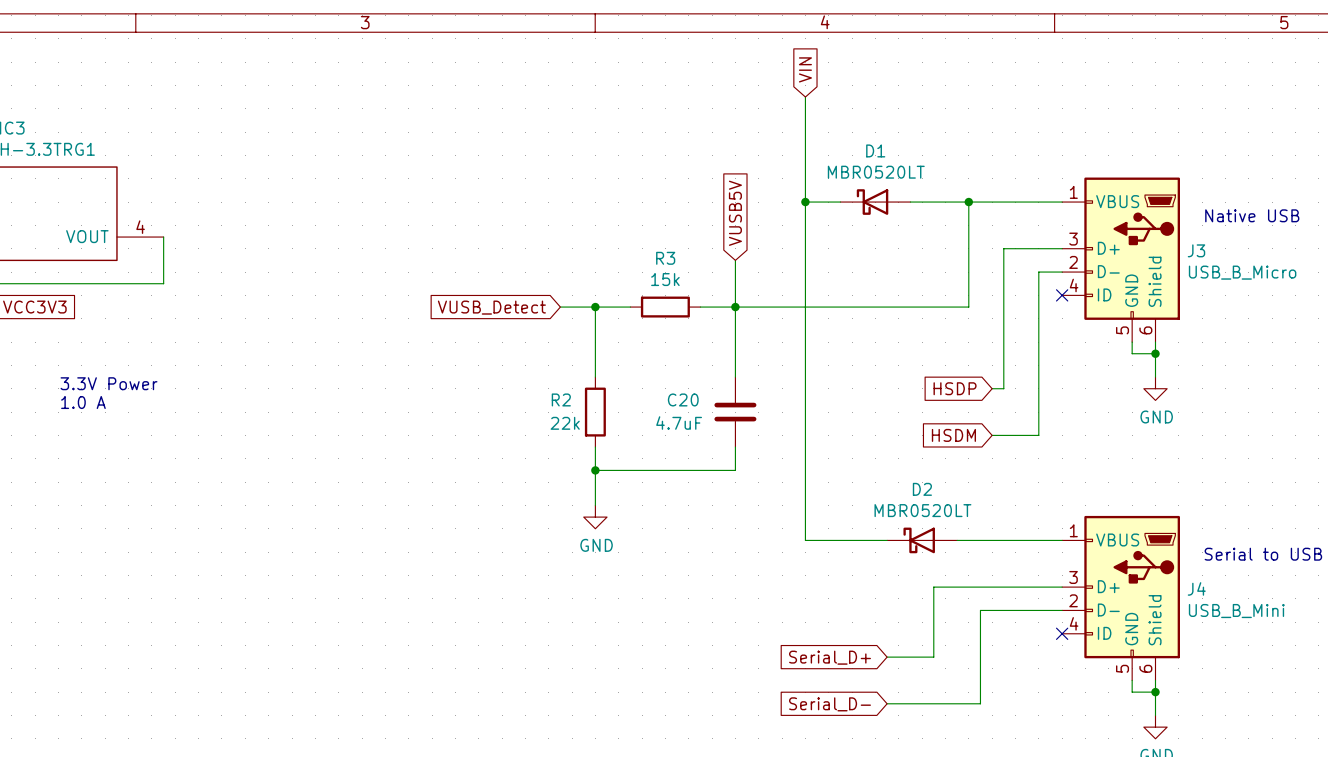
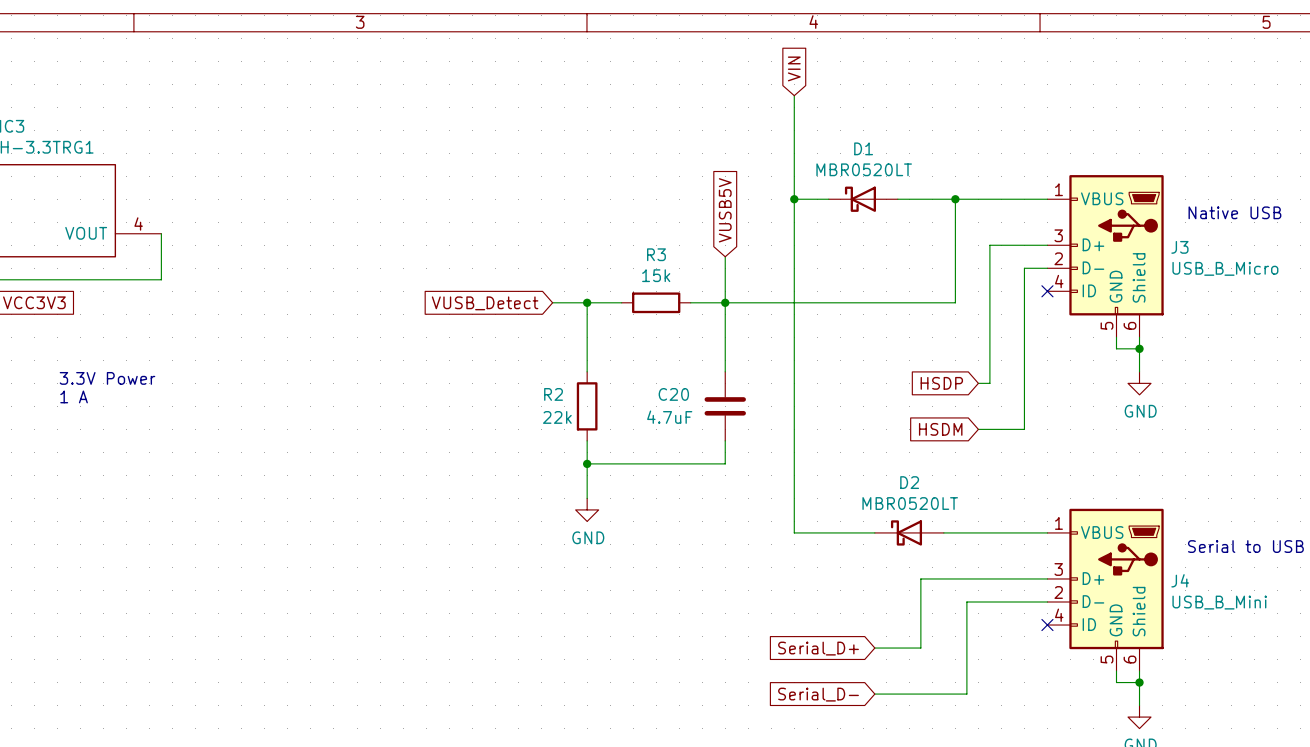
text: 1.0 A (83, 402) -> 1 A (74, 396)

